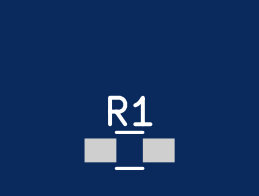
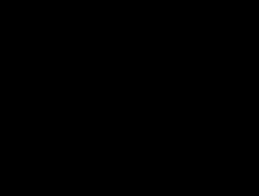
R1: (129, 150) -> none

